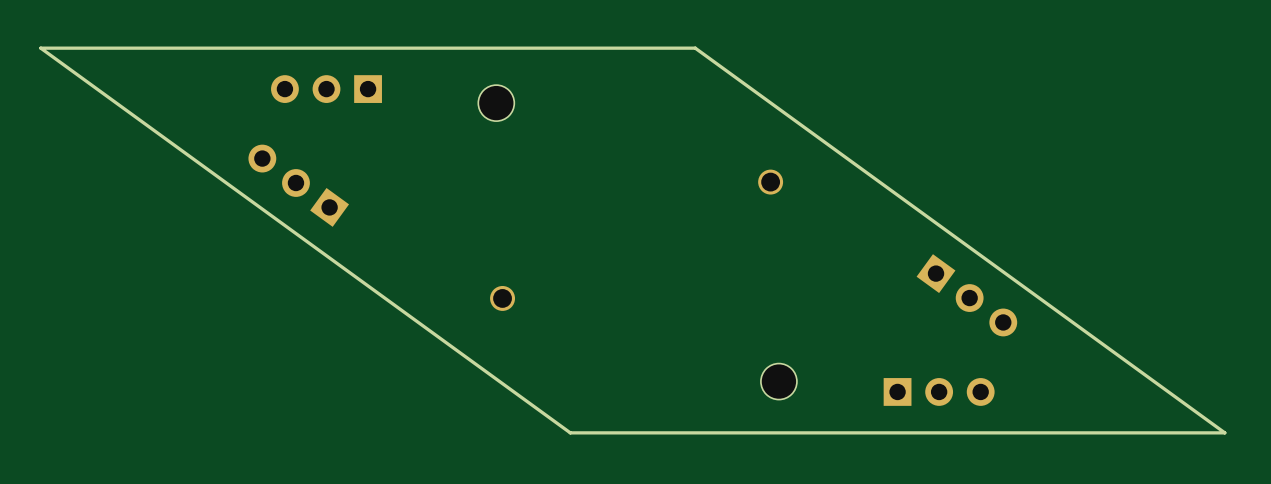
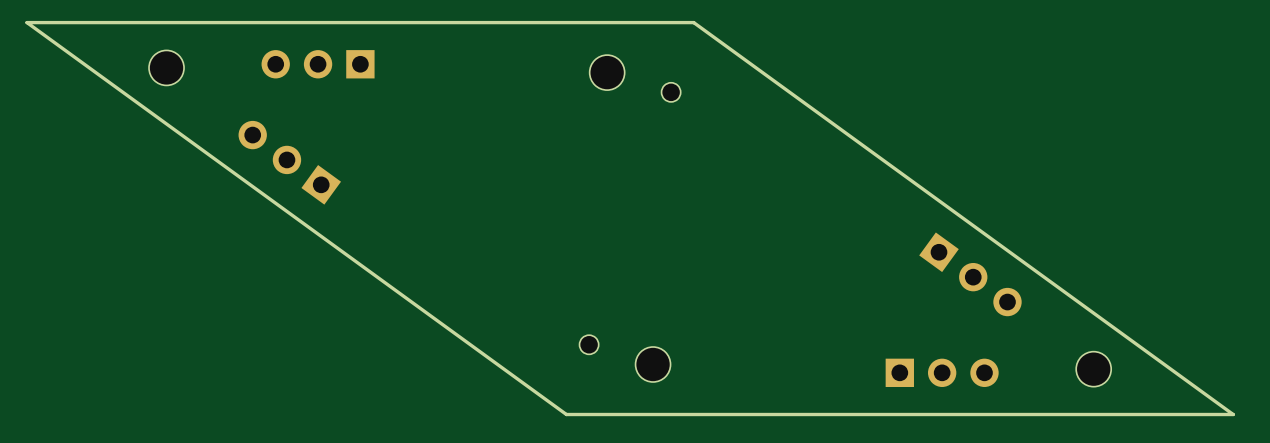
part: none -> (166, 67)
part: none -> (607, 72)
part: (496, 103) -> none
part: none -> (671, 92)
part: (770, 182) -> none
part: (502, 298) -> none
part: none -> (589, 344)
part: (778, 381) -> none
part: none -> (653, 364)
part: none -> (1093, 369)

